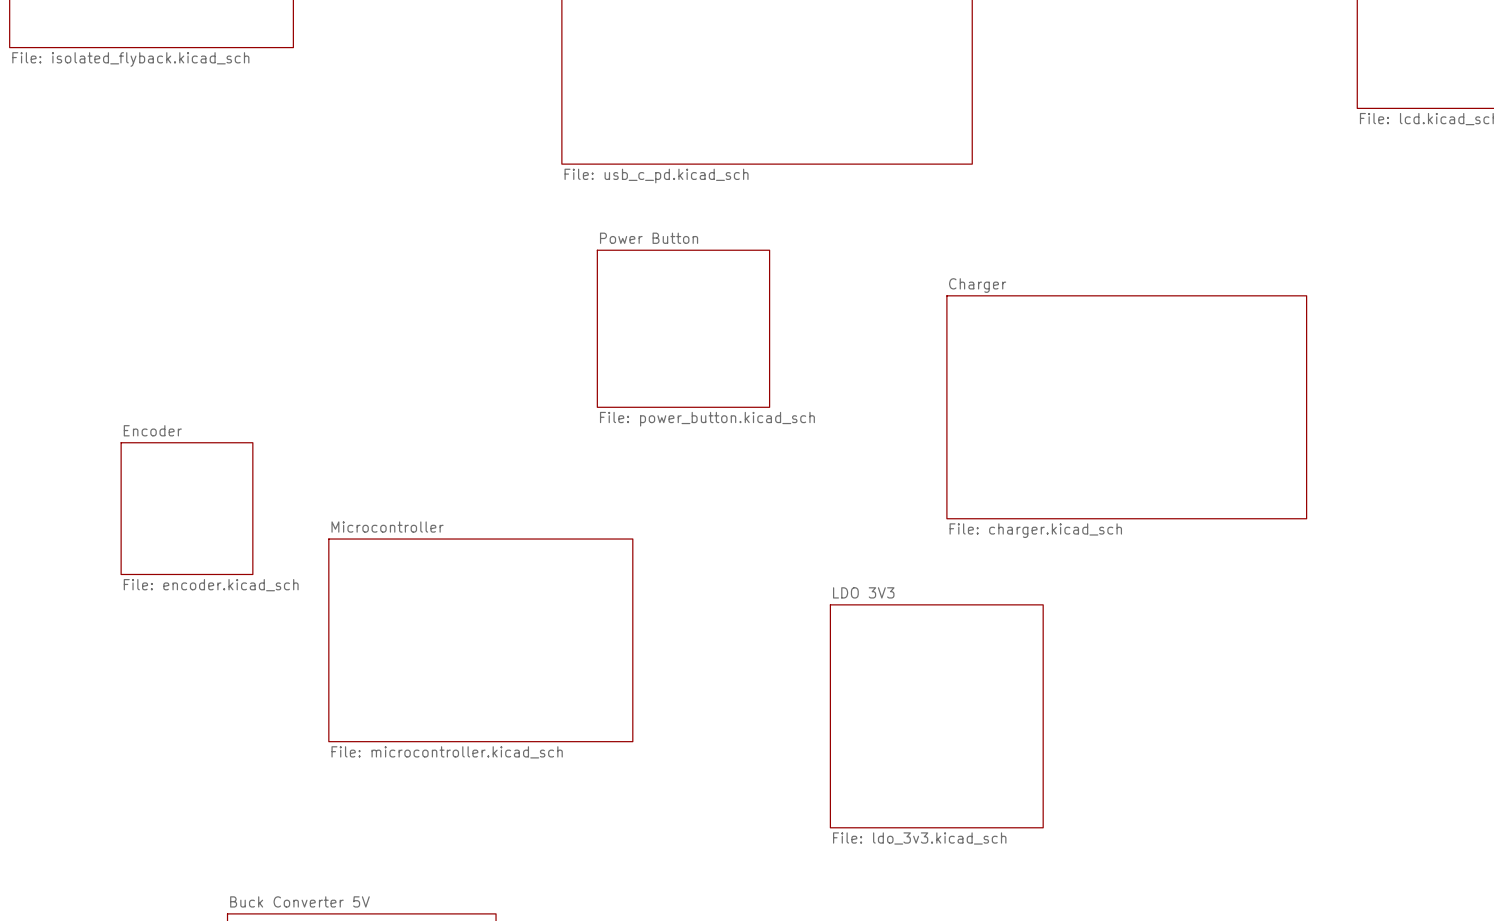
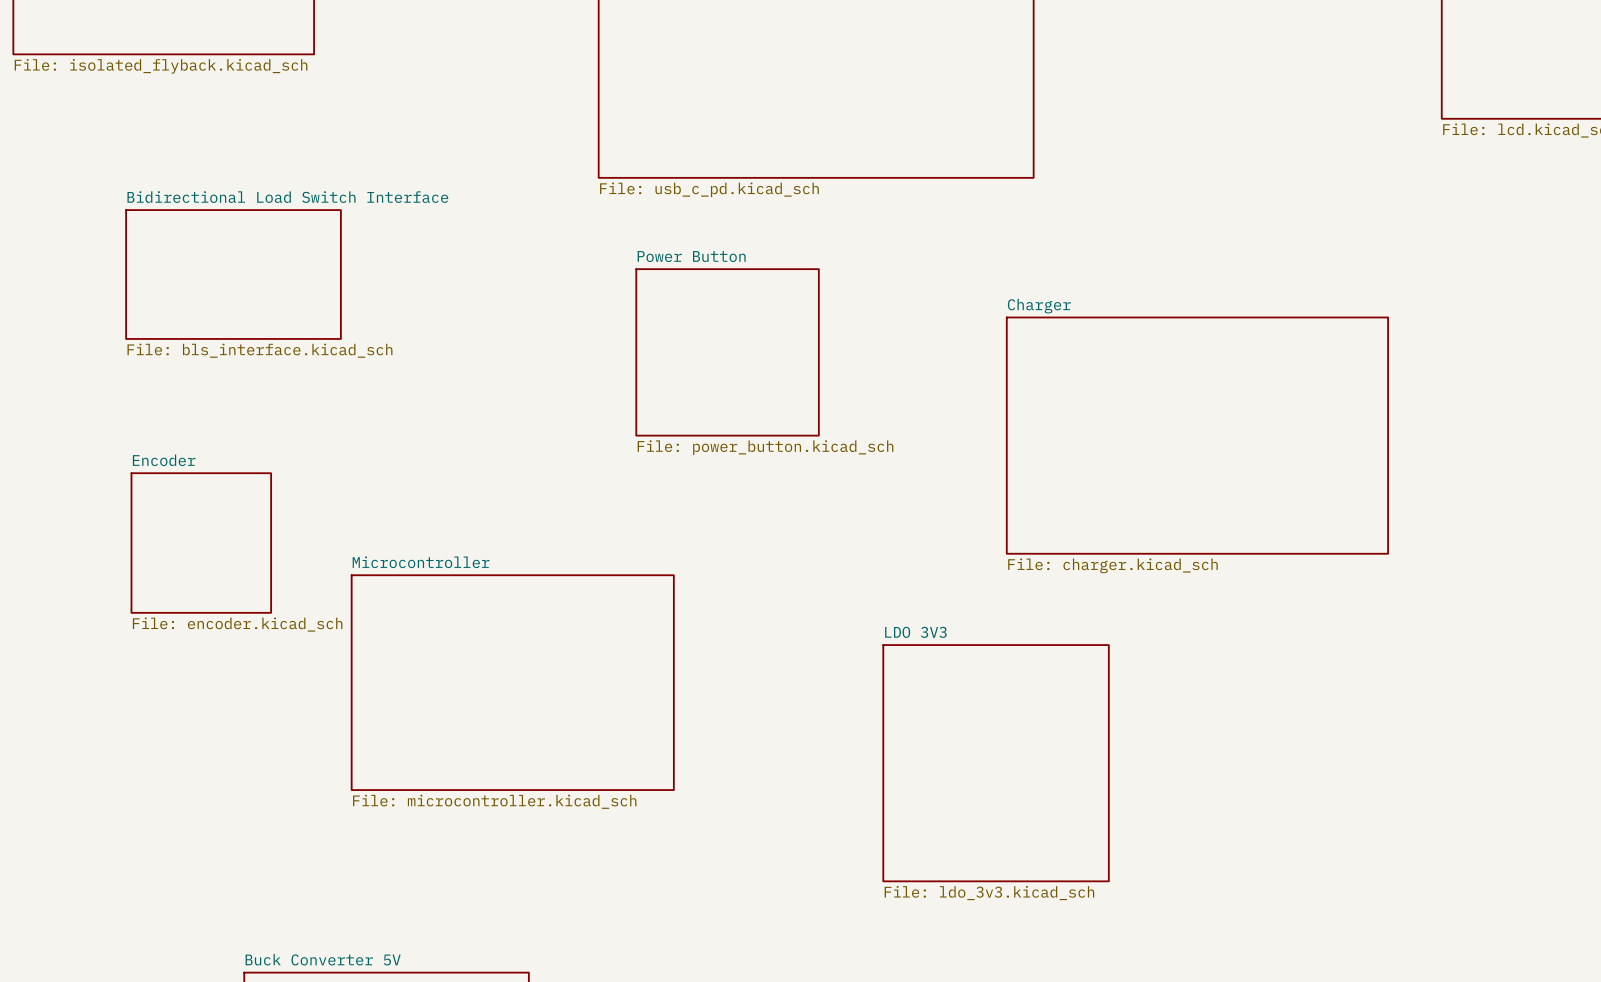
sheet Bidirectional Load Switch Interface: none -> File: bls_interface.kicad_sch (233, 274)

